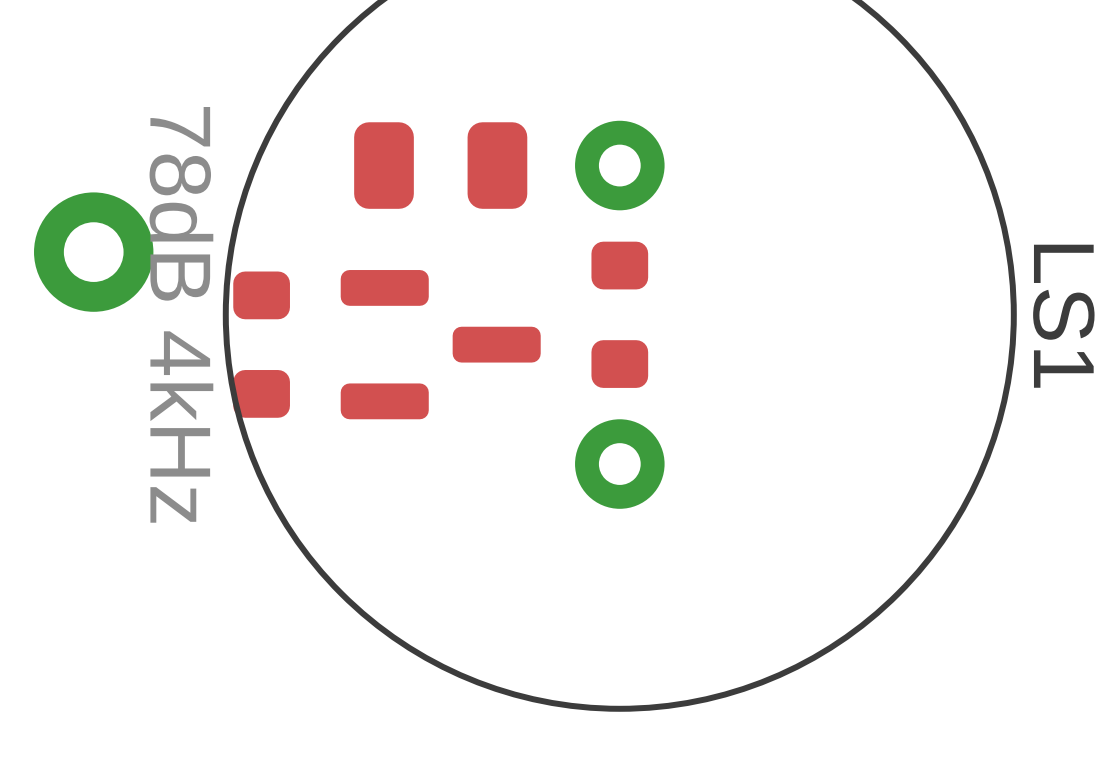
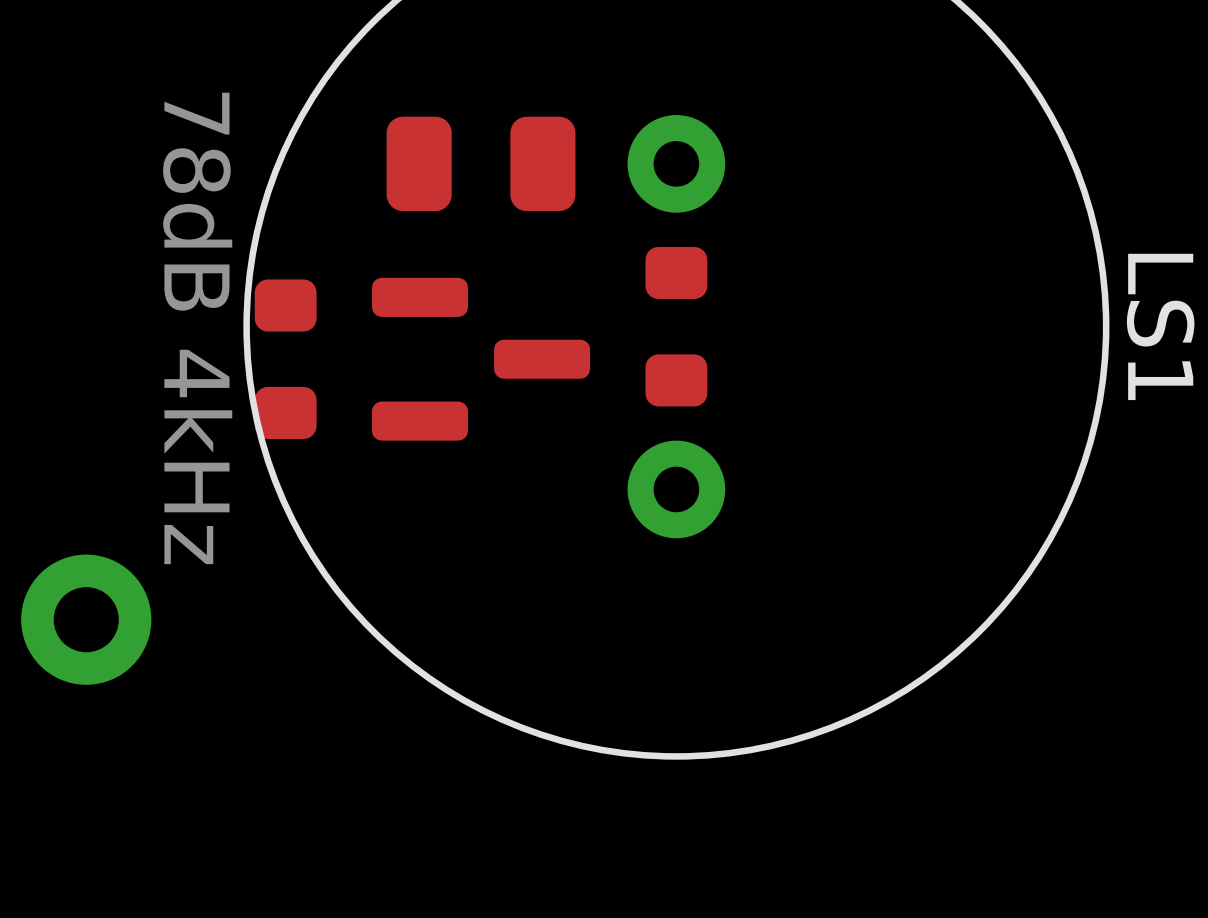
part position: (93, 252) -> (86, 619)

